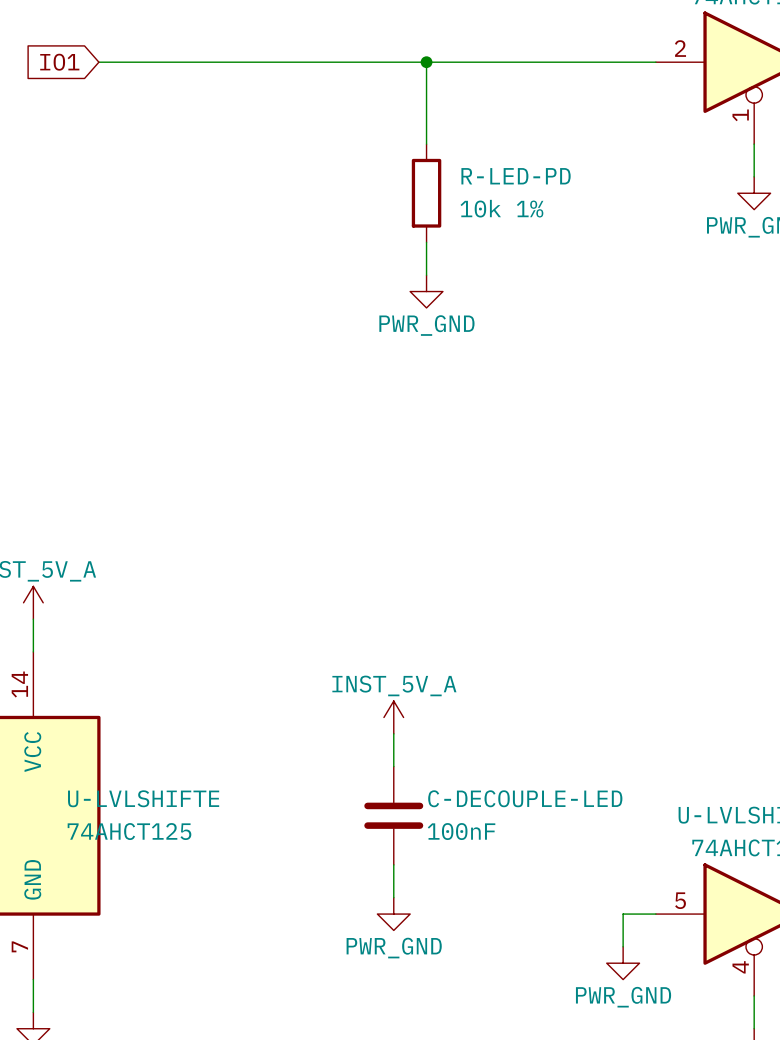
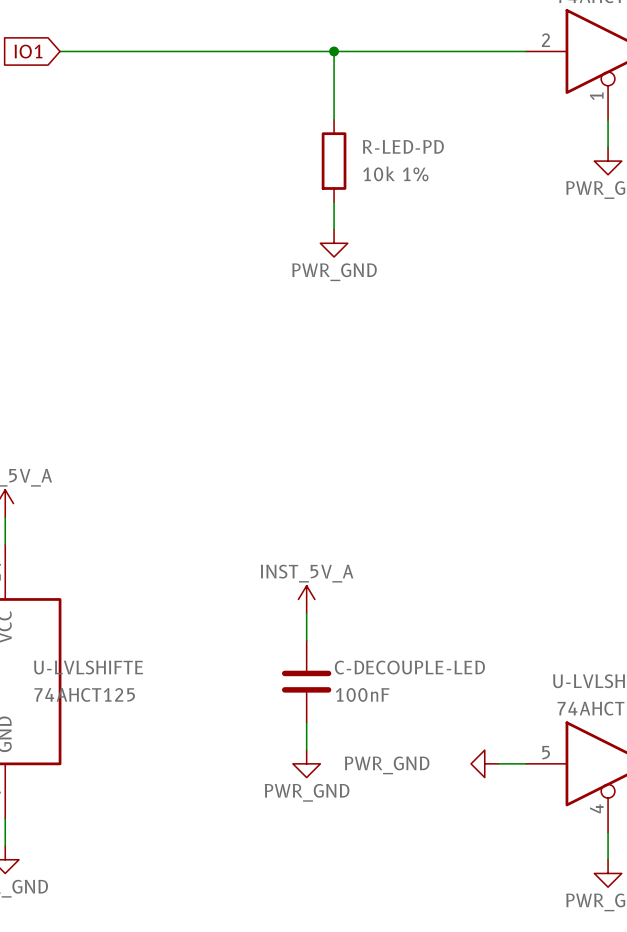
wire: (623, 914) (623, 946) -> none
power symbol rotation: 0° (623, 963) -> 90° clockwise (484, 763)
power symbol position: PWR_GND (623, 963) -> PWR_GND (484, 763)
power symbol text position: PWR_GND (623, 997) -> PWR_GND (387, 765)

